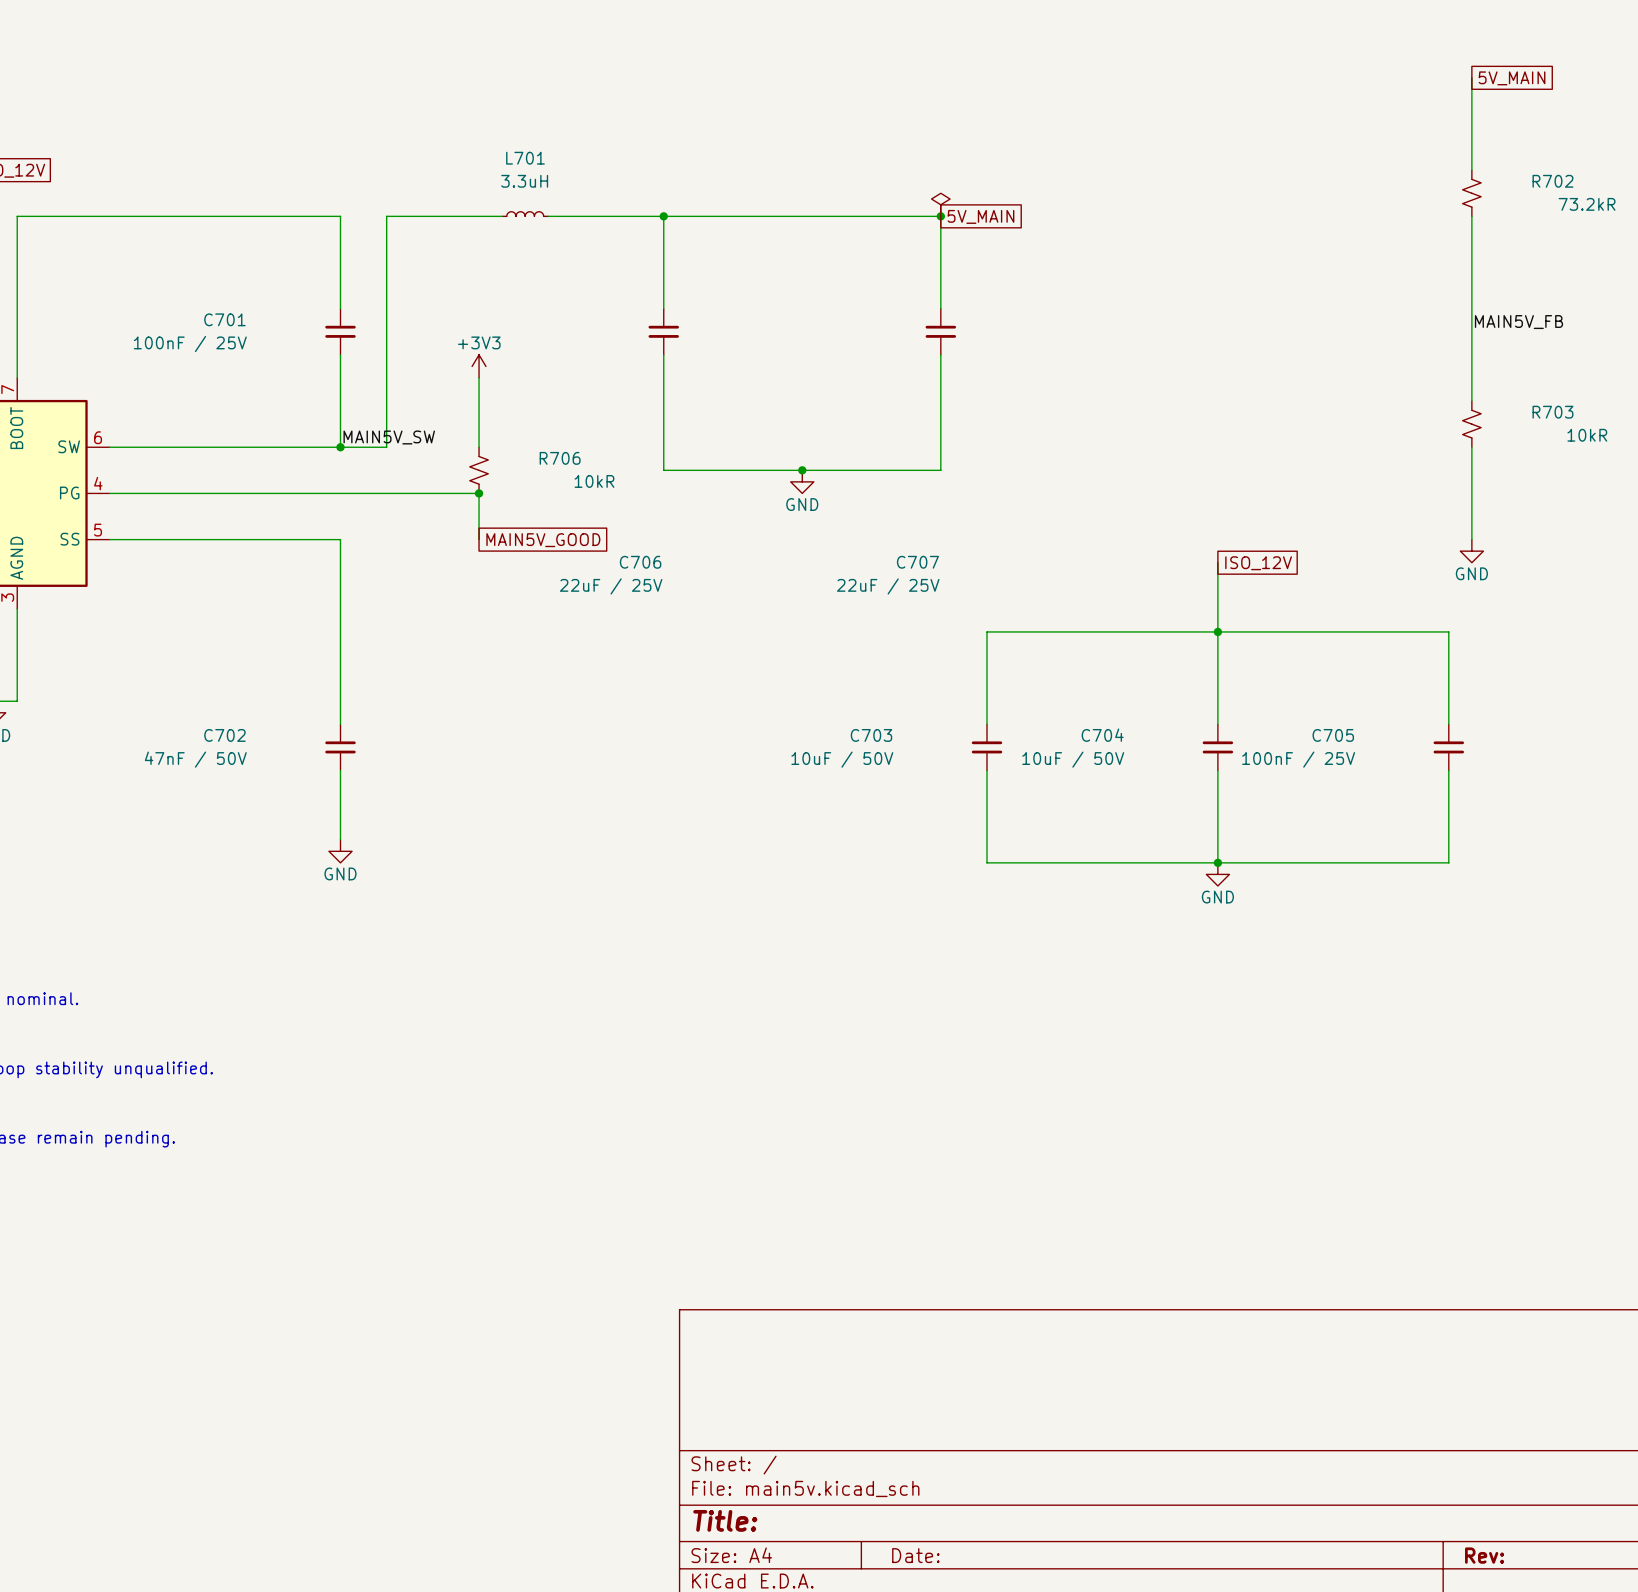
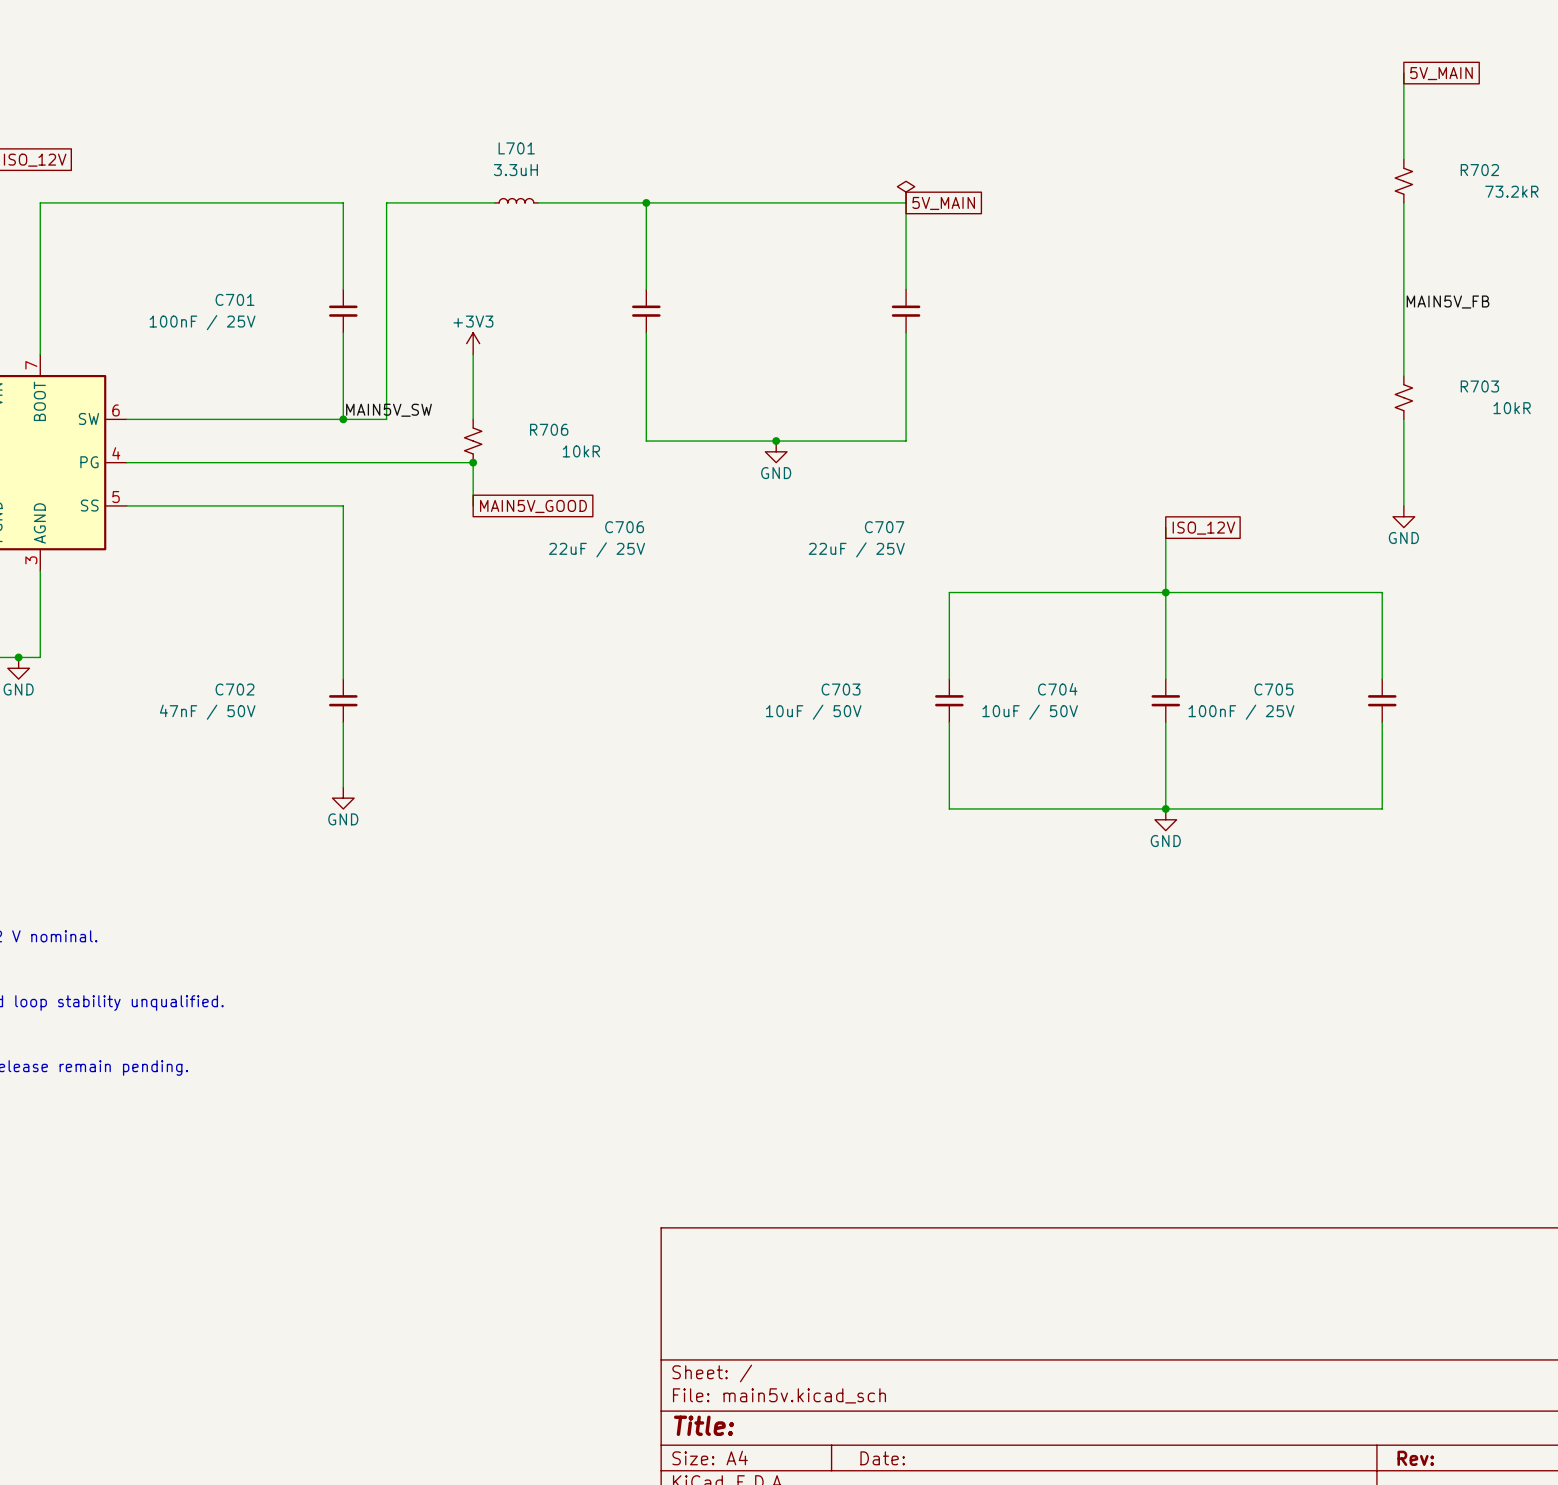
junction: (940, 216) -> none

